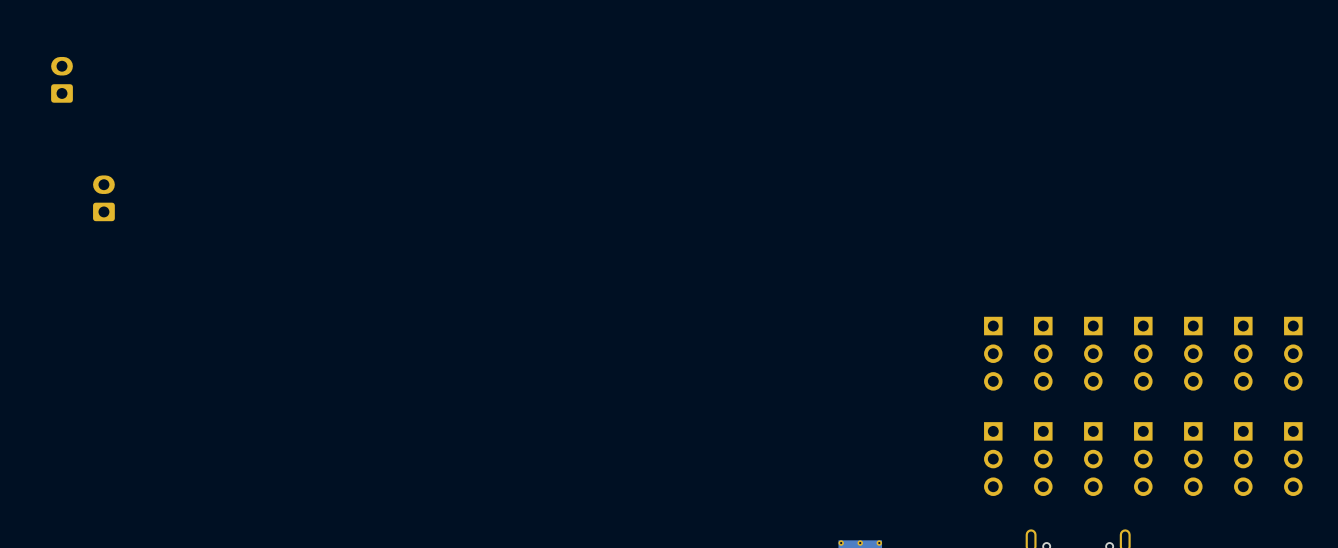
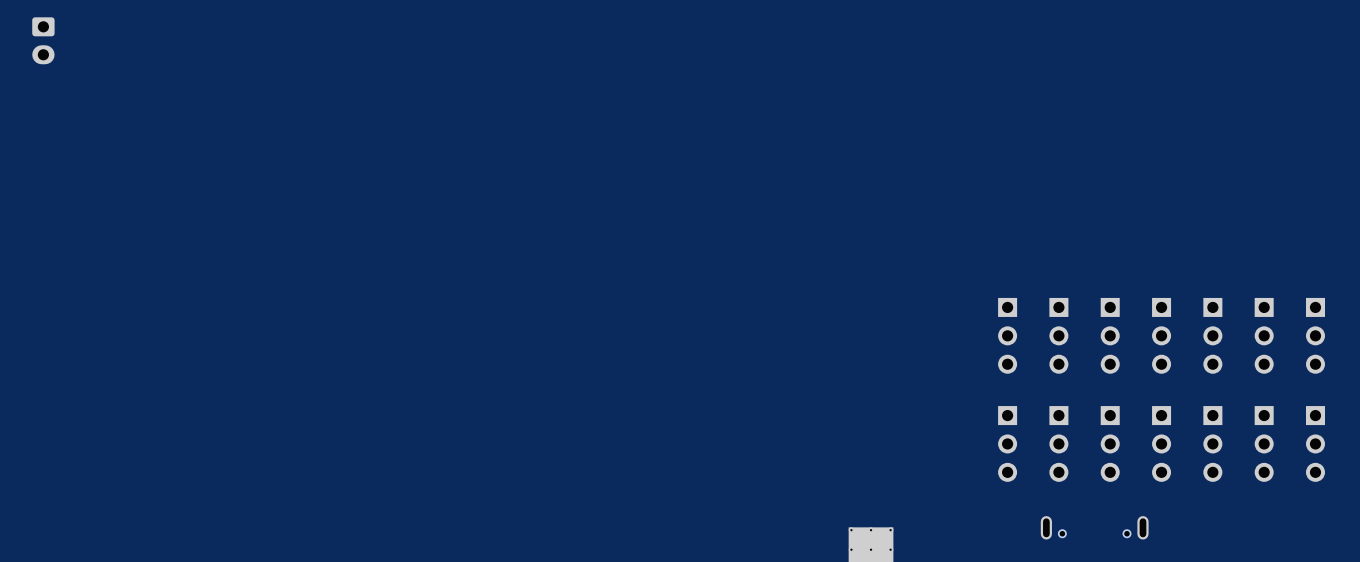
part rotation: 0° (62, 79) -> 180° (43, 40)
part: (103, 198) -> none

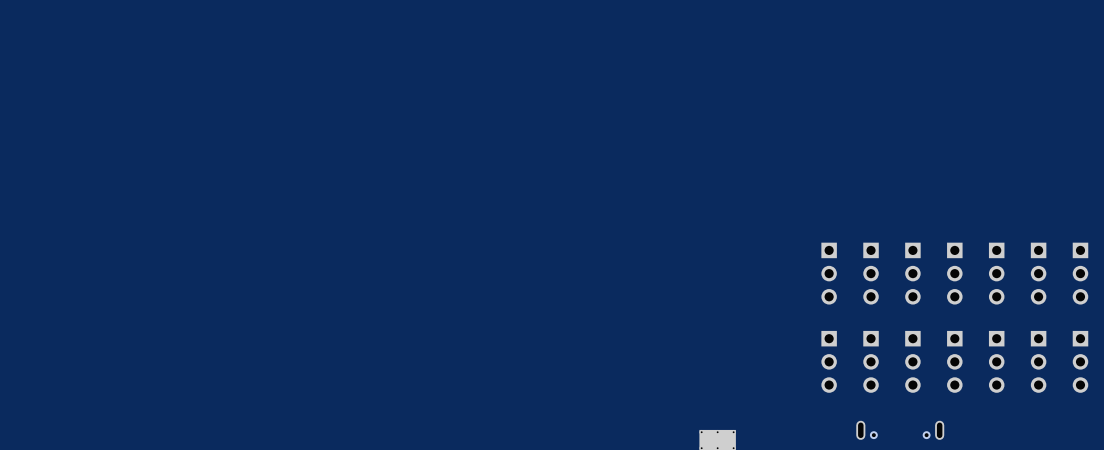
part: (43, 40) -> none

